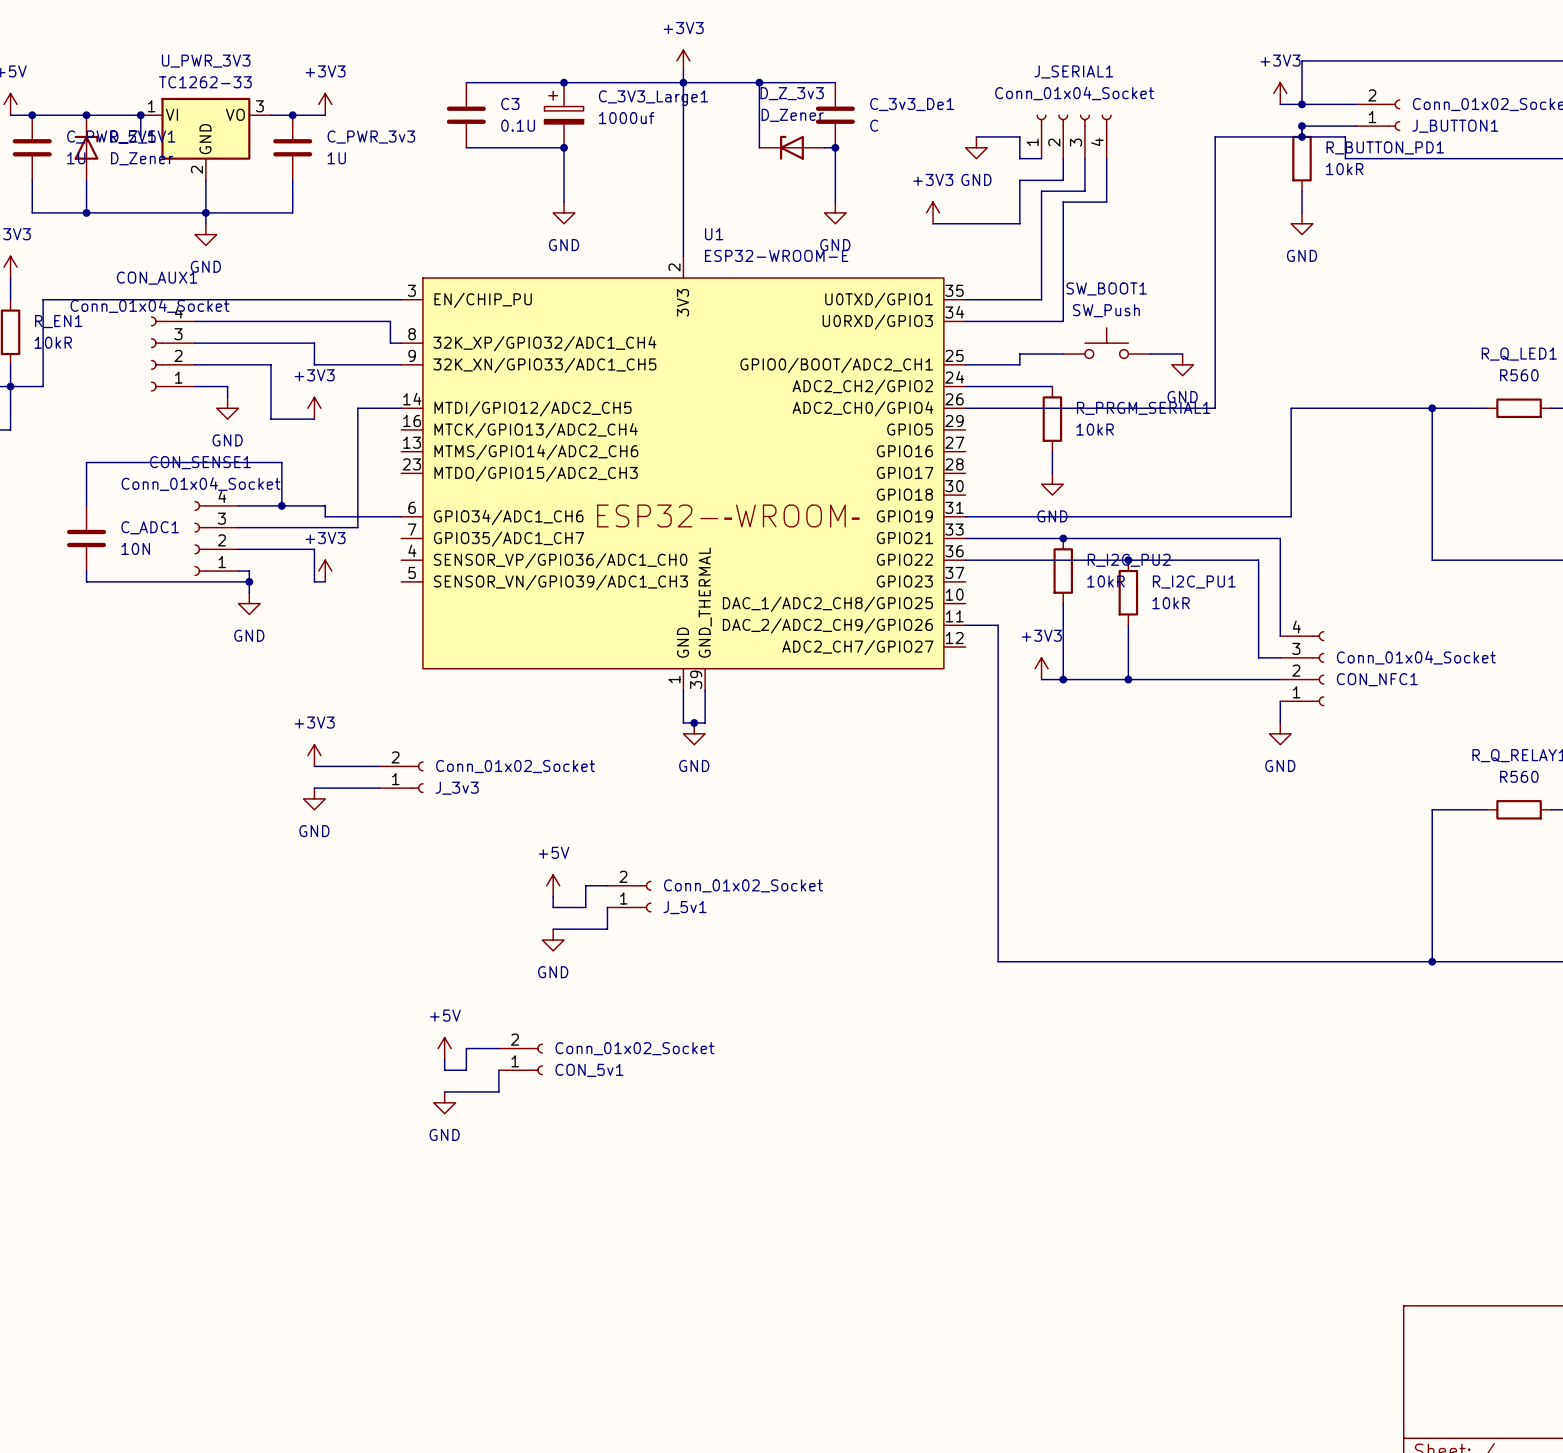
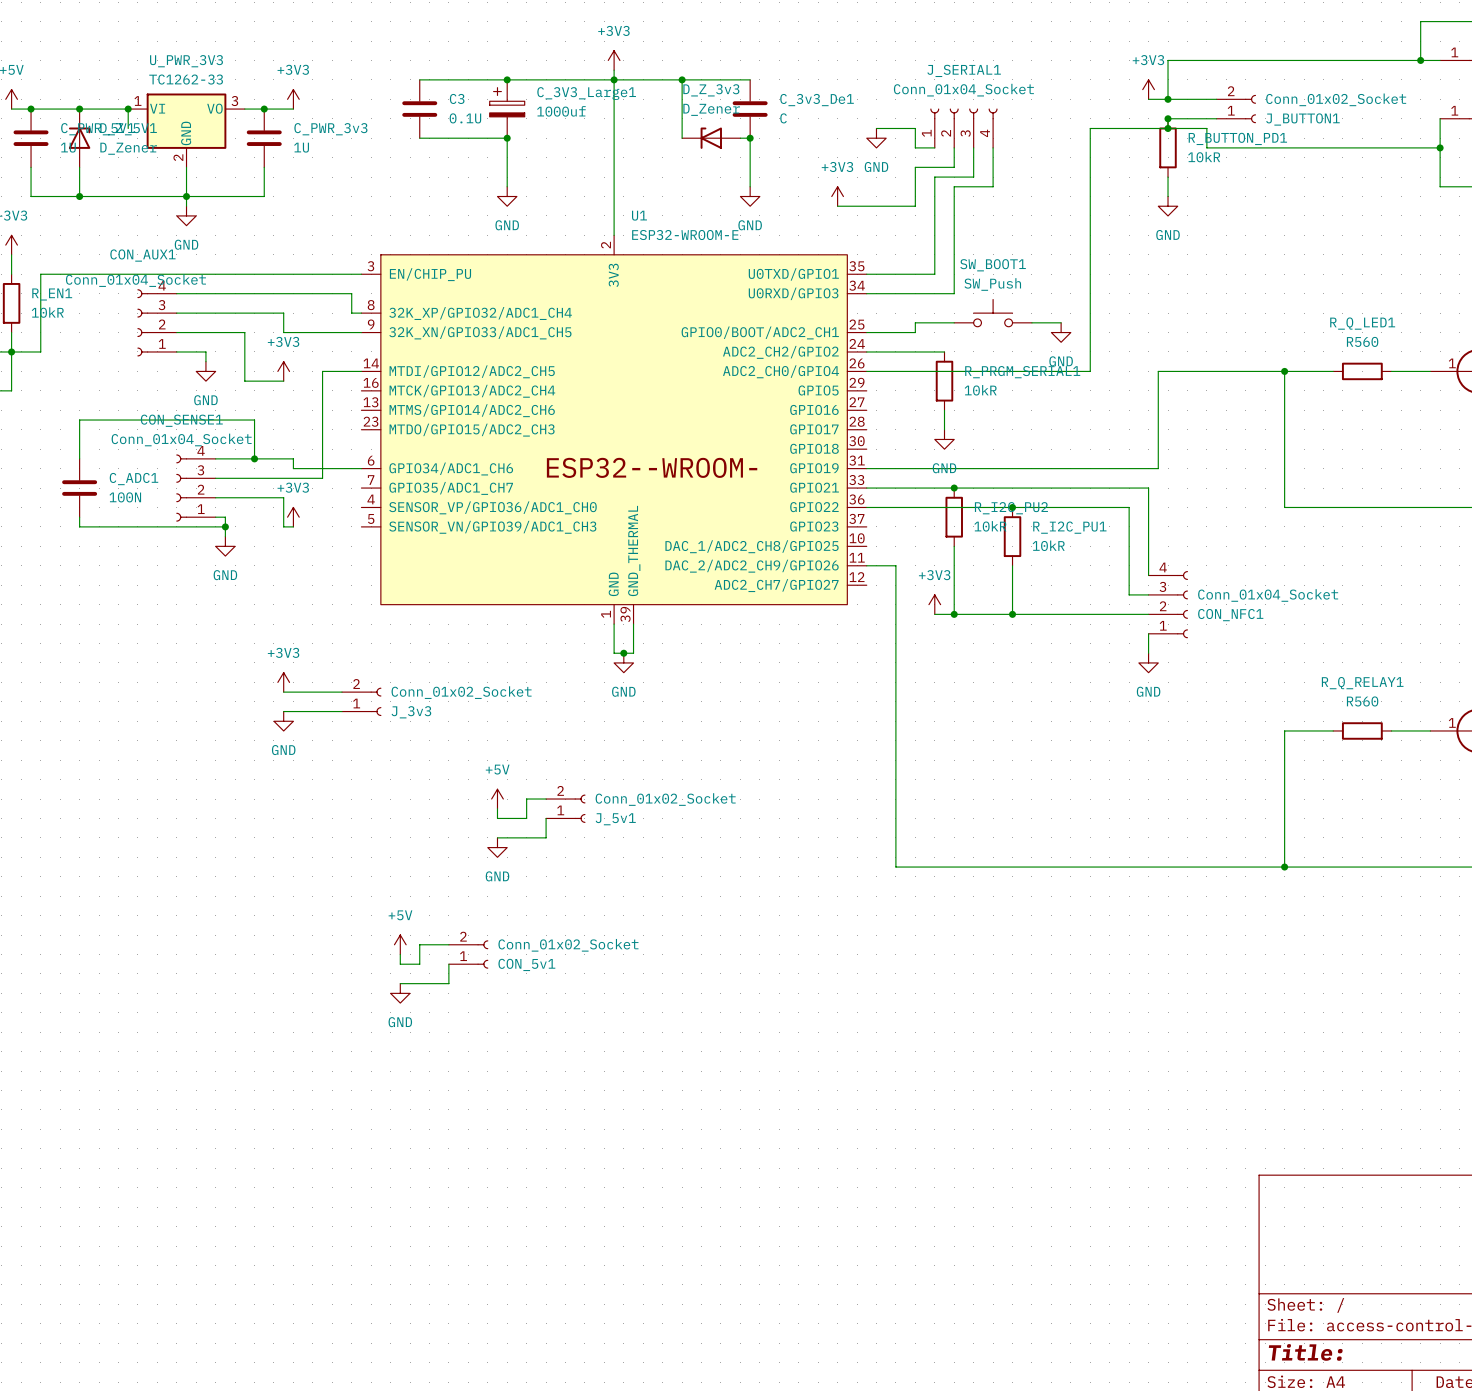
C_ADC1 value: 10N (135, 548) -> 100N (125, 497)

